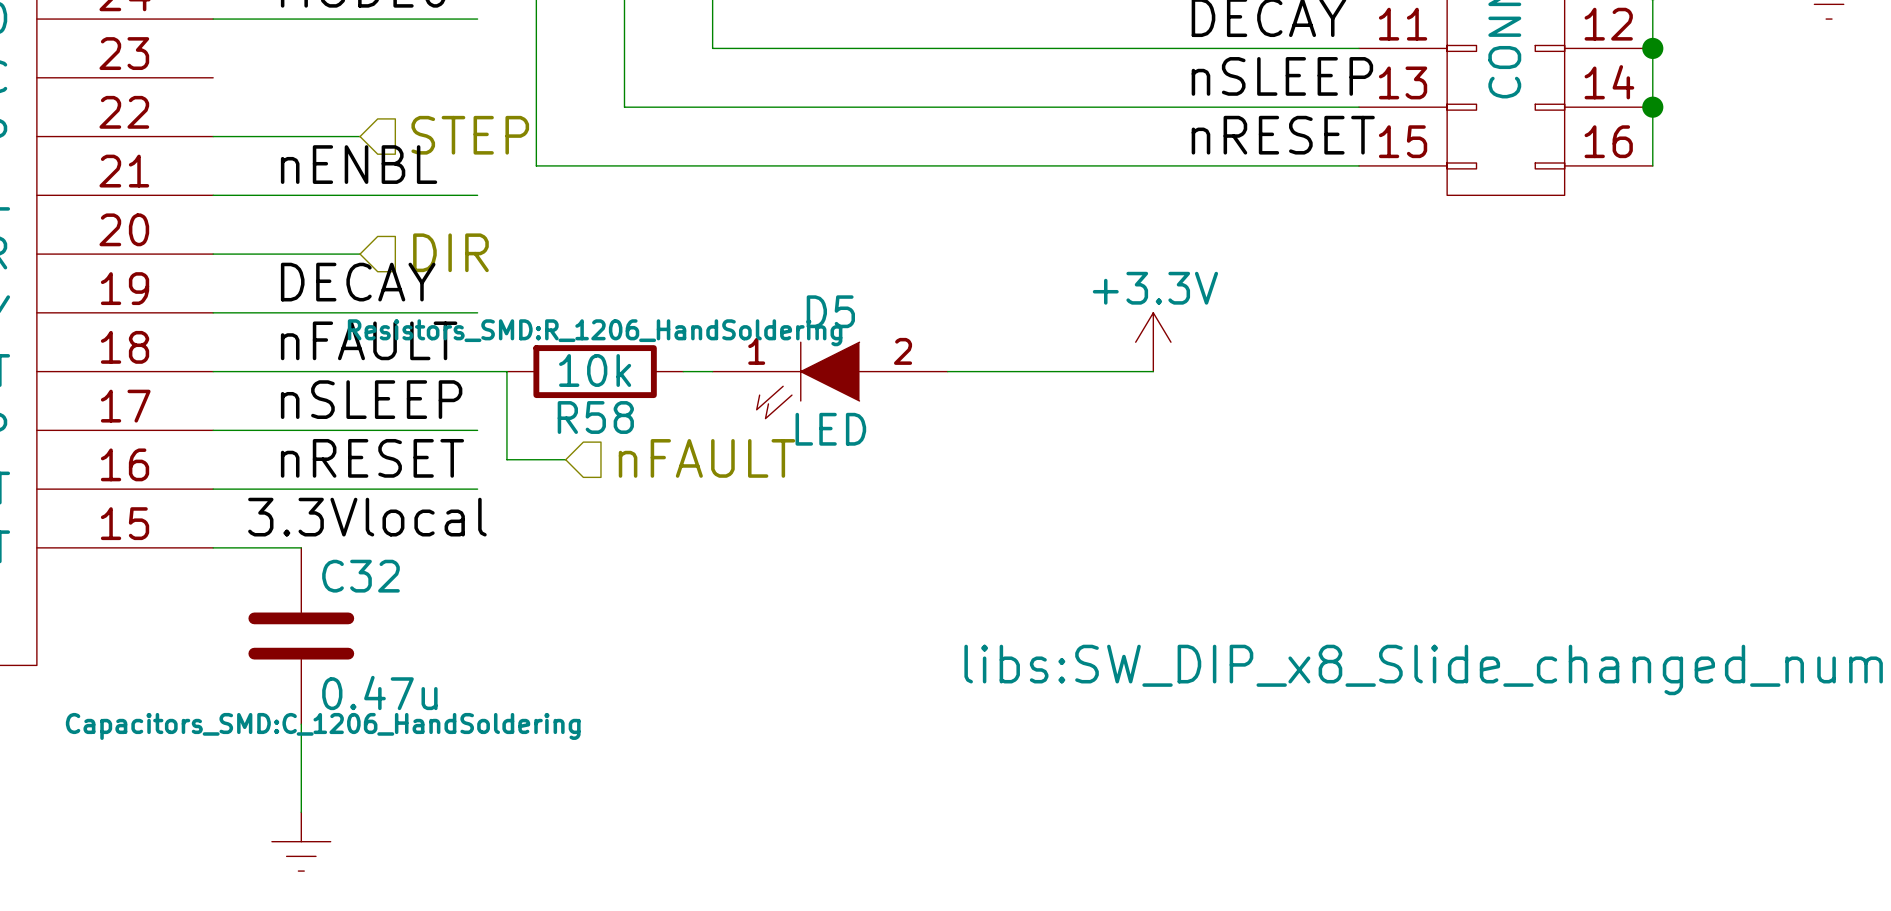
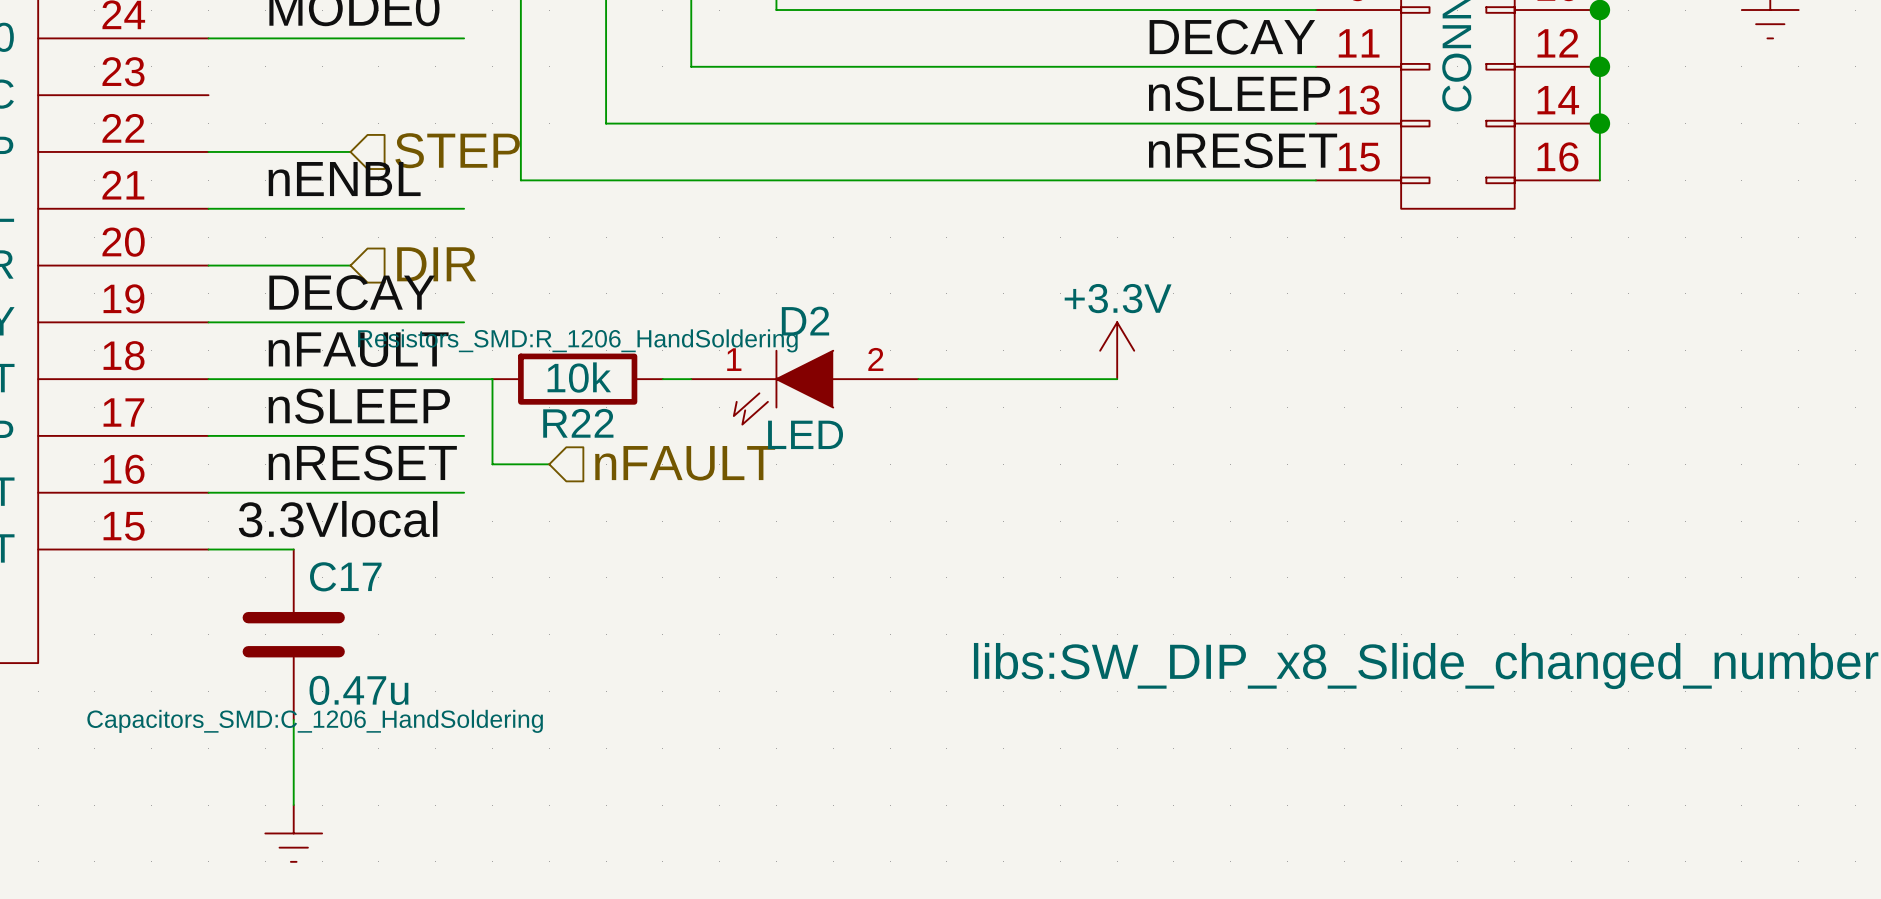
D5 name: D5 (830, 311) -> D2 (805, 321)
R58 name: R58 (595, 417) -> R22 (578, 423)
C32 name: C32 (360, 576) -> C17 (345, 576)

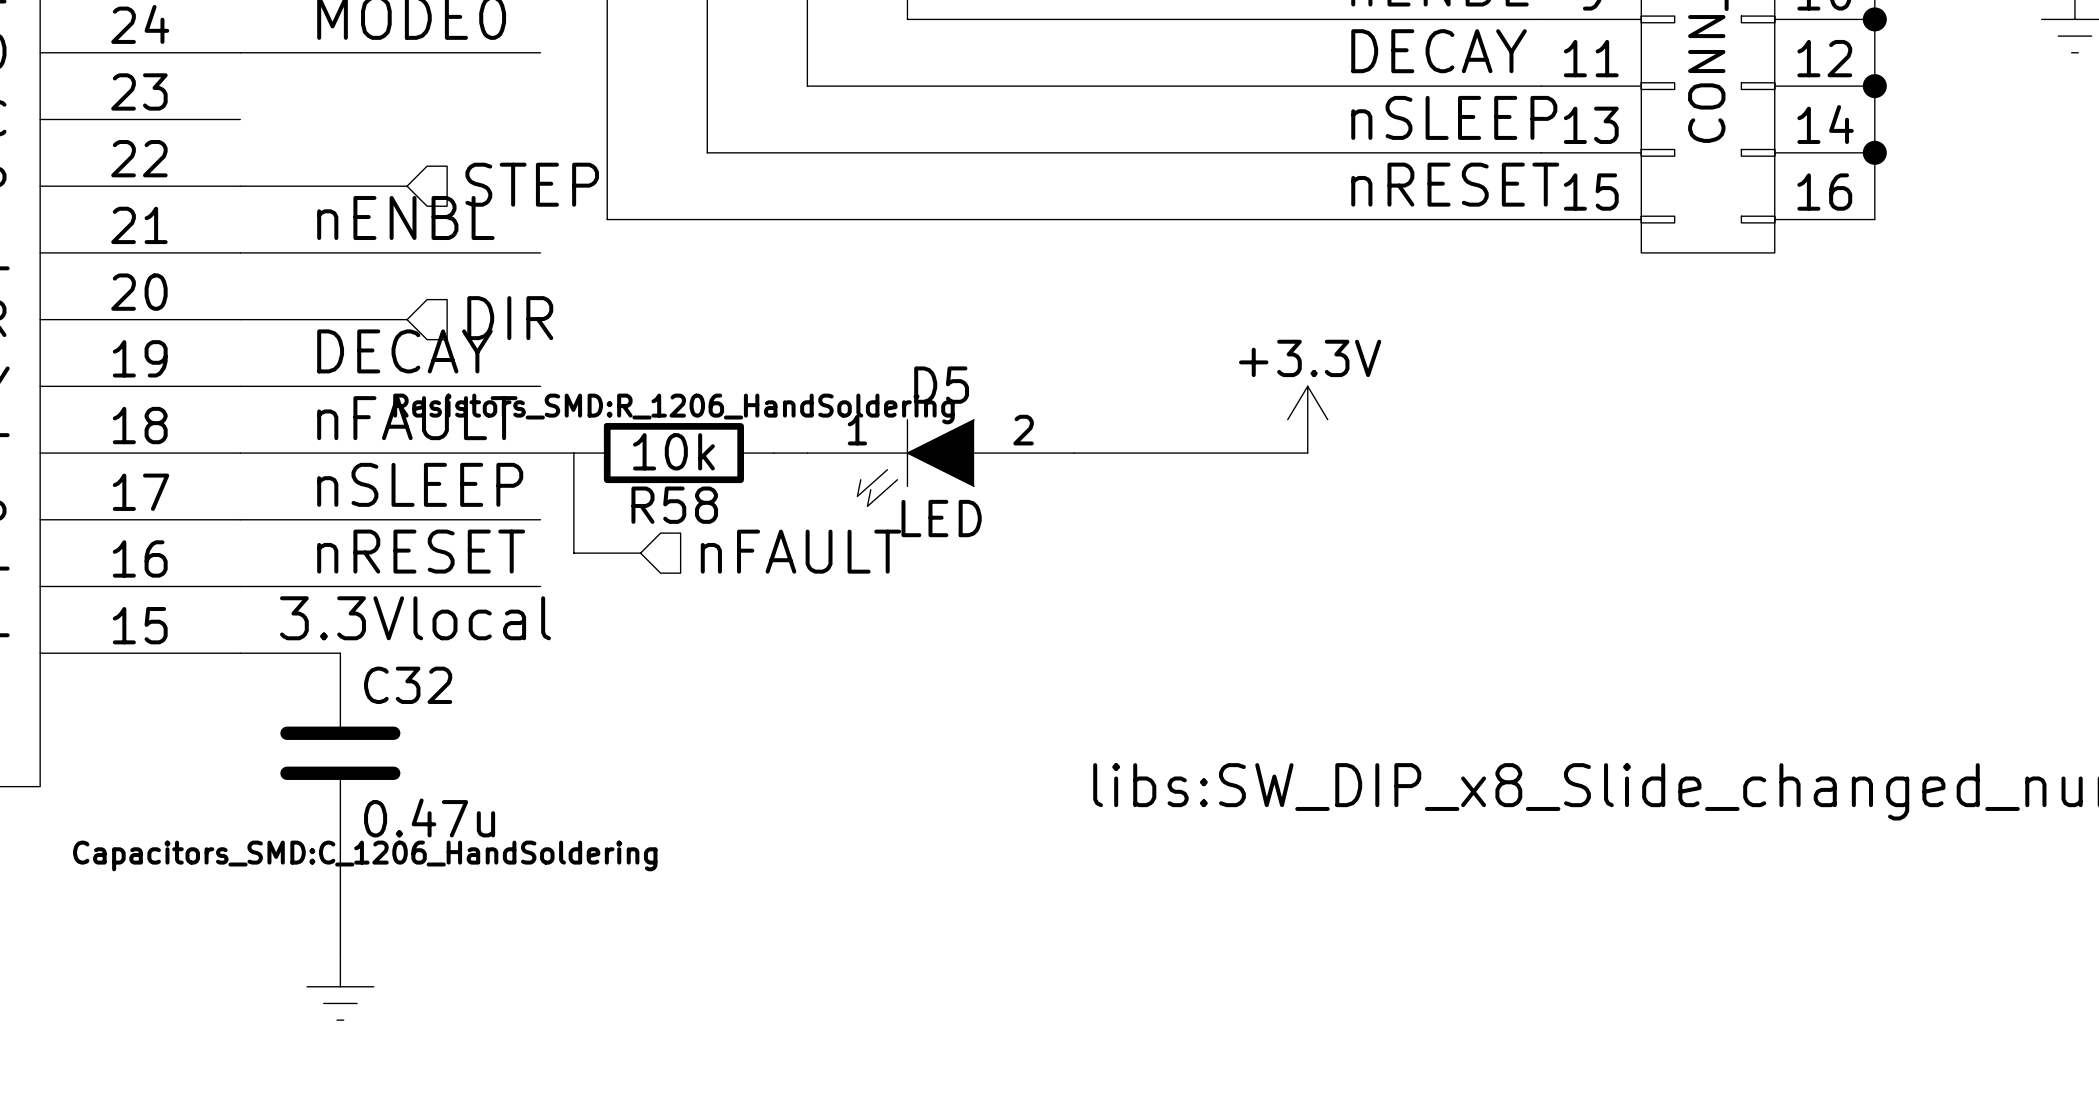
D2 name: D2 (805, 321) -> D5 (941, 385)
R22 name: R22 (578, 423) -> R58 (674, 505)
C17 name: C17 (345, 576) -> C32 (408, 685)

